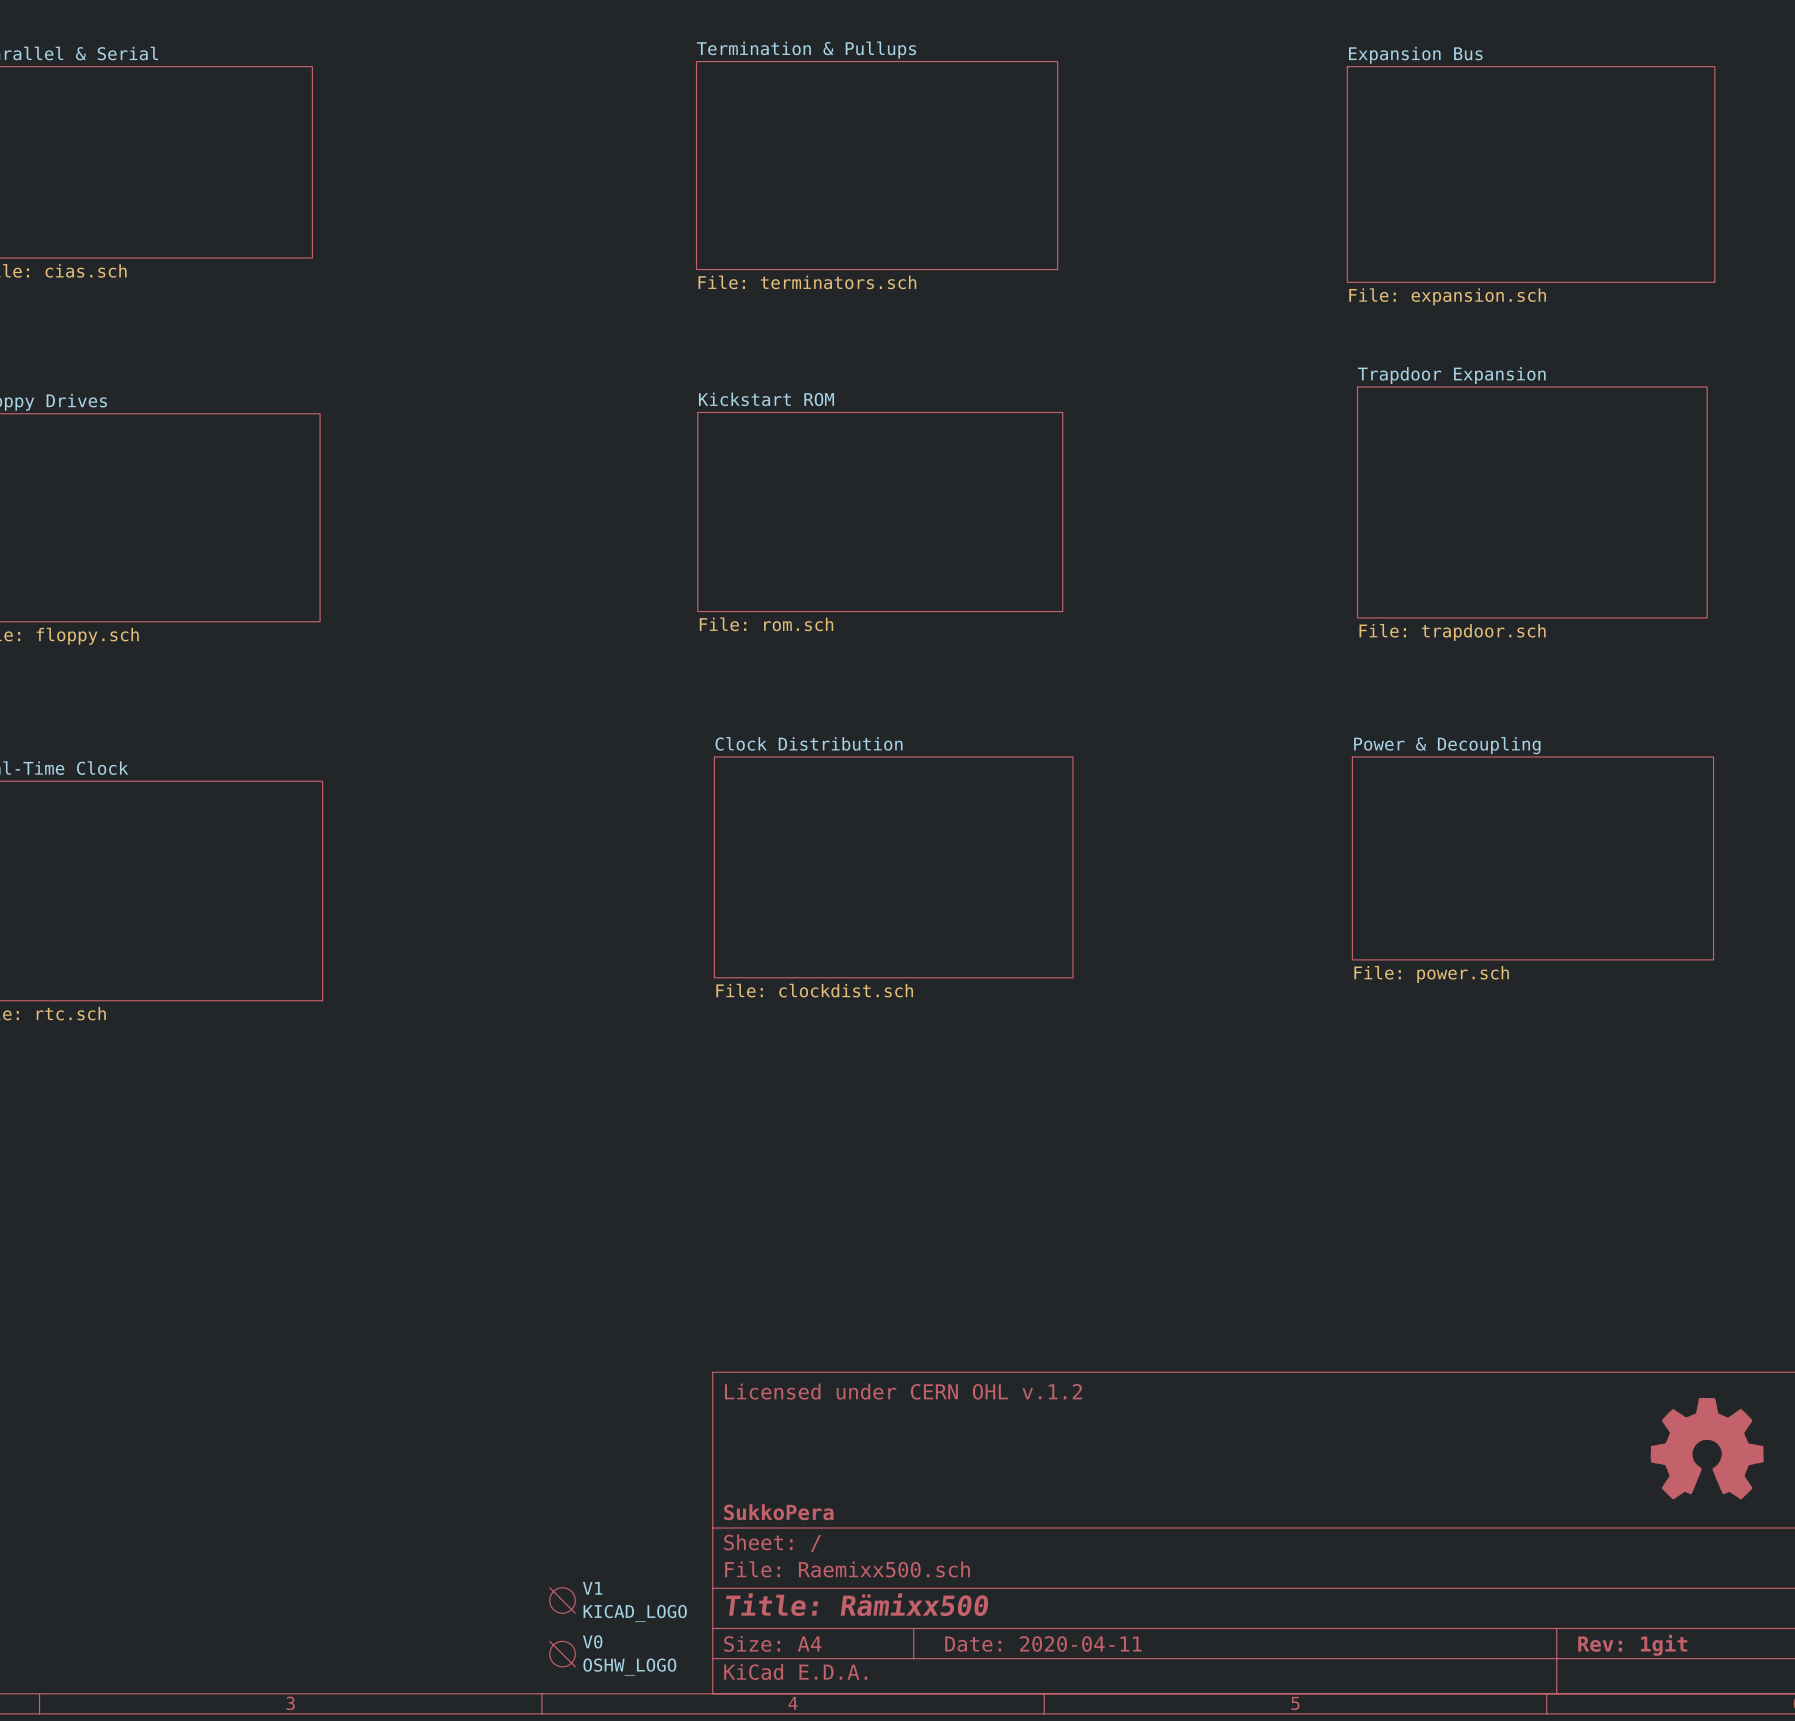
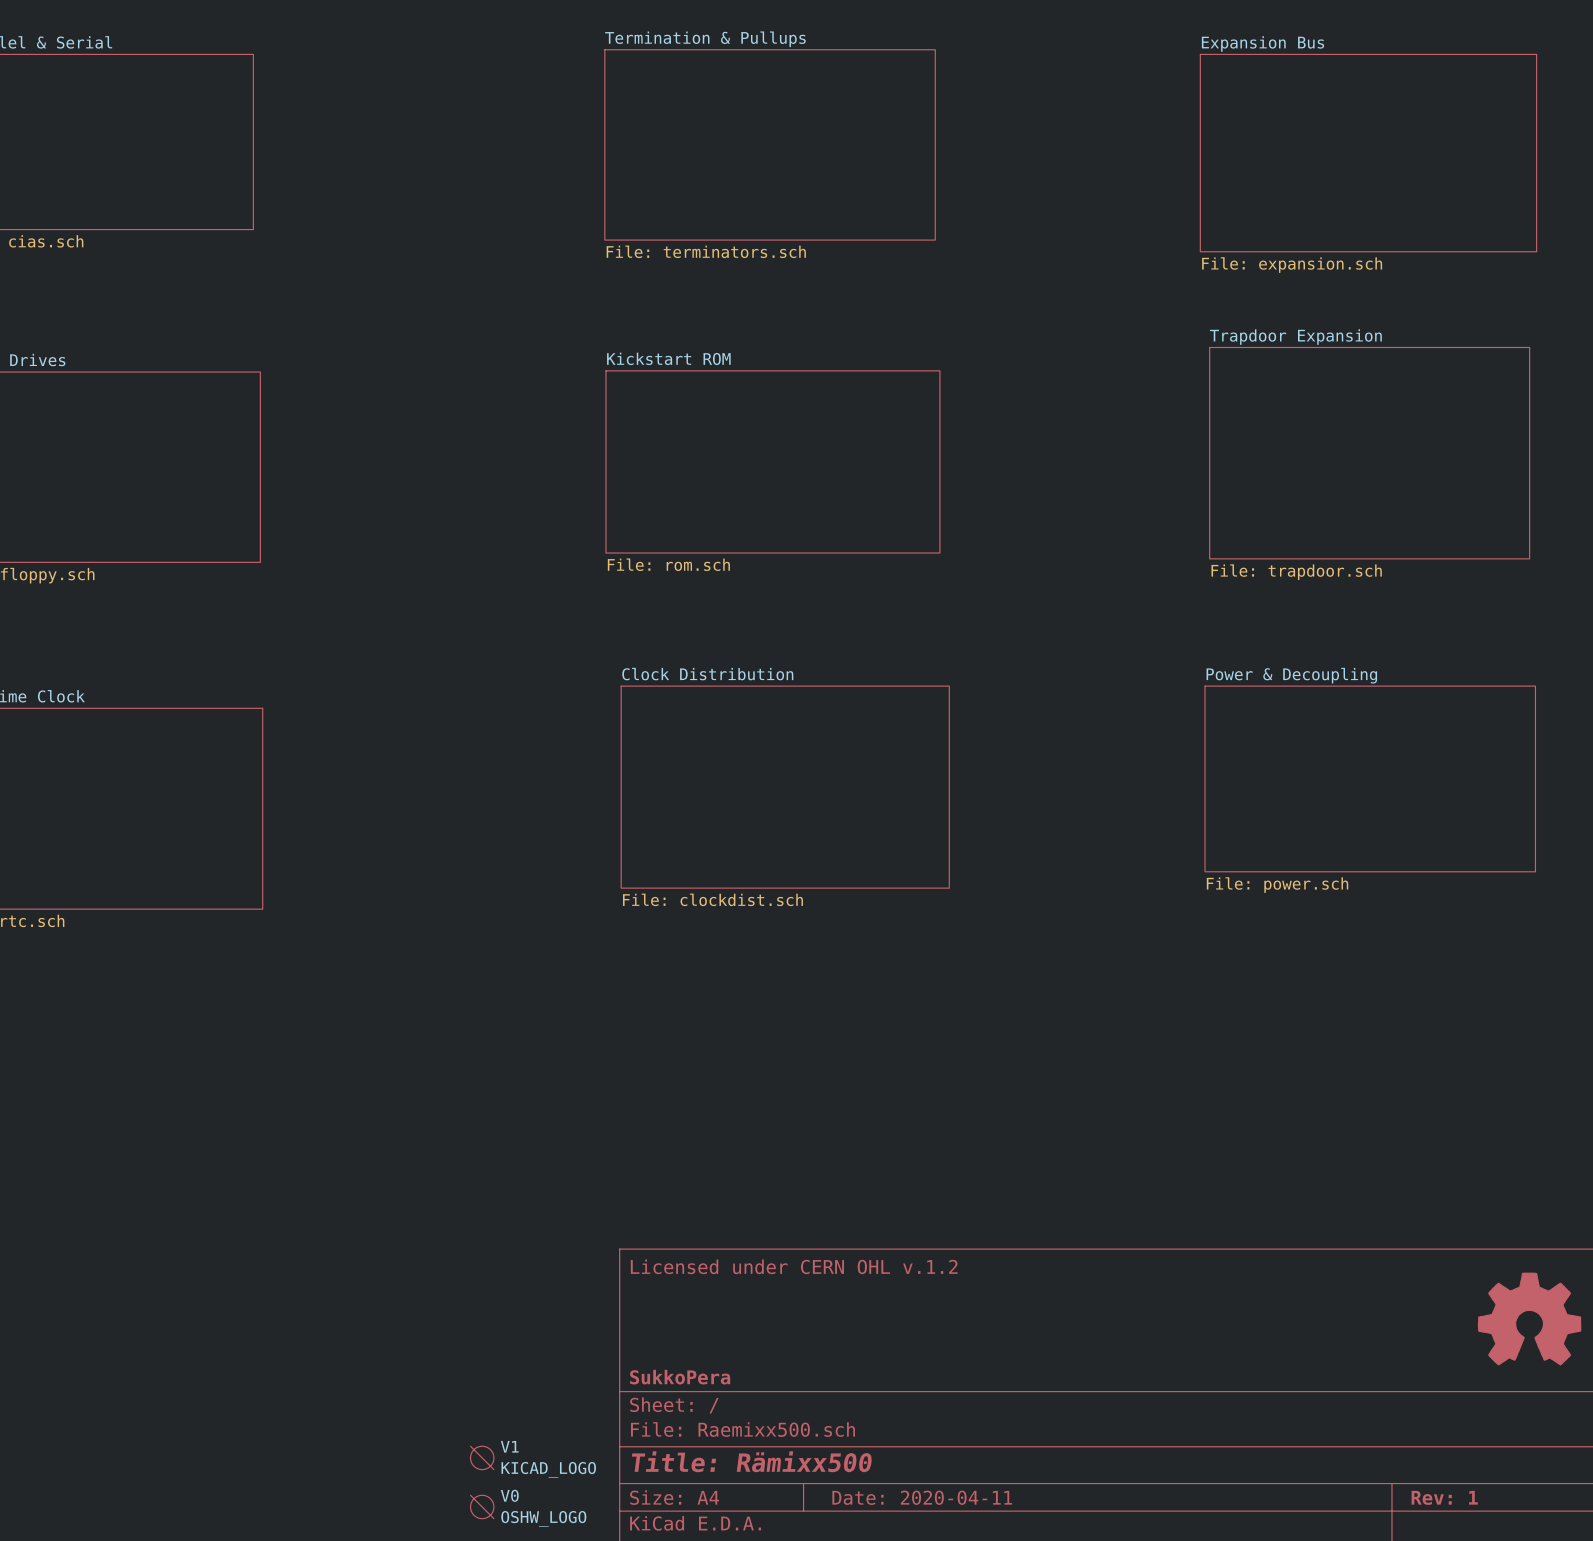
title block: Rev: 1git (1632, 1645) -> Rev: 1 (1444, 1497)

